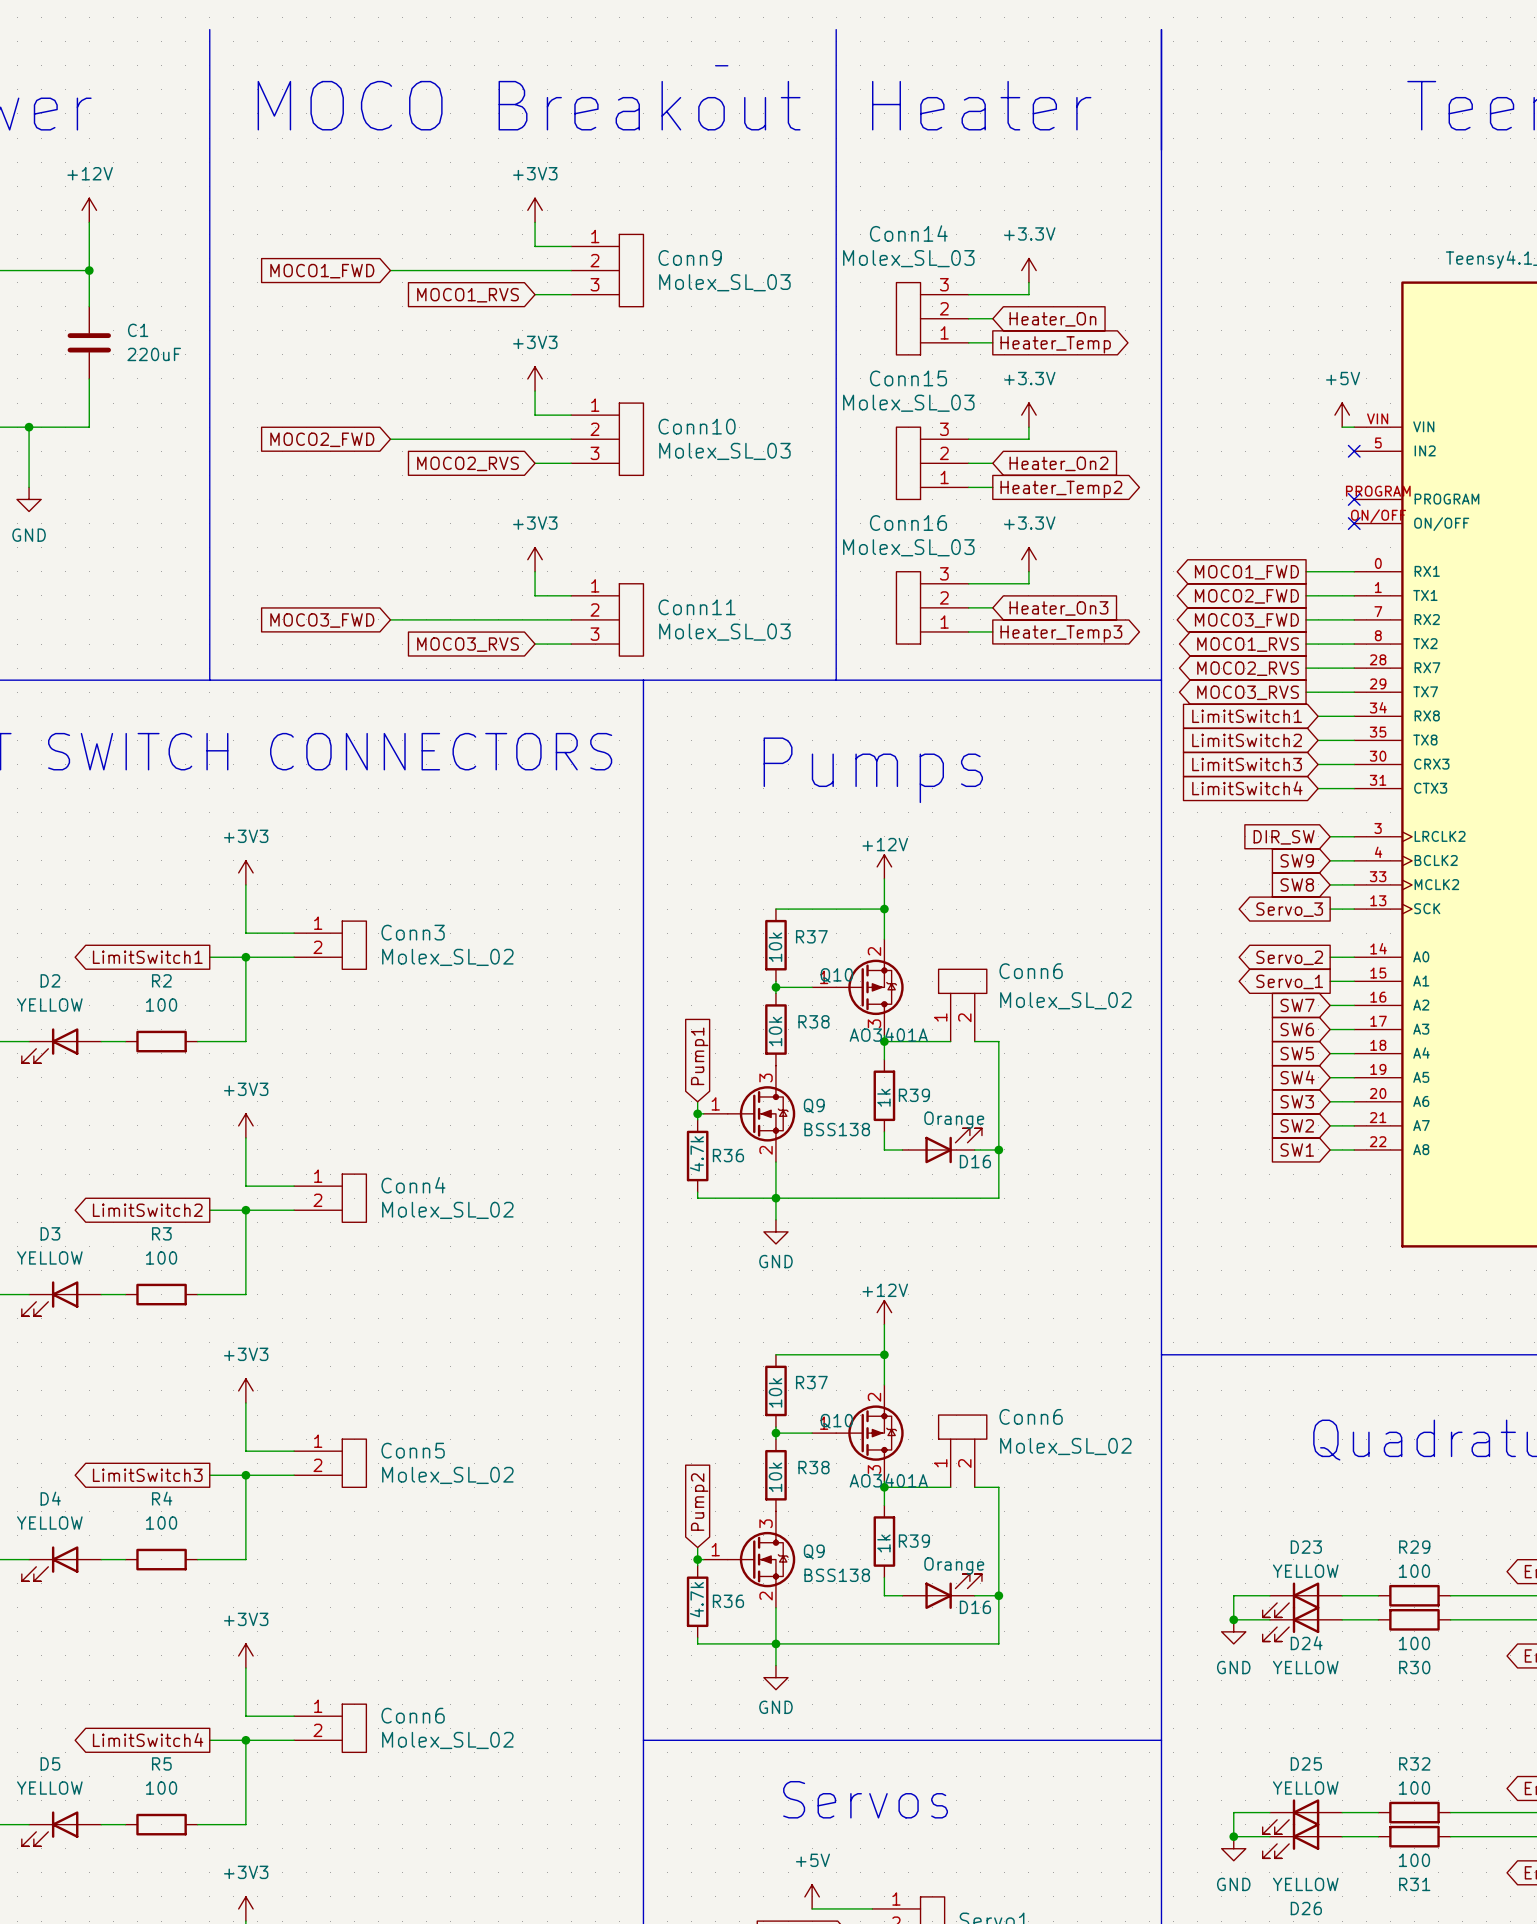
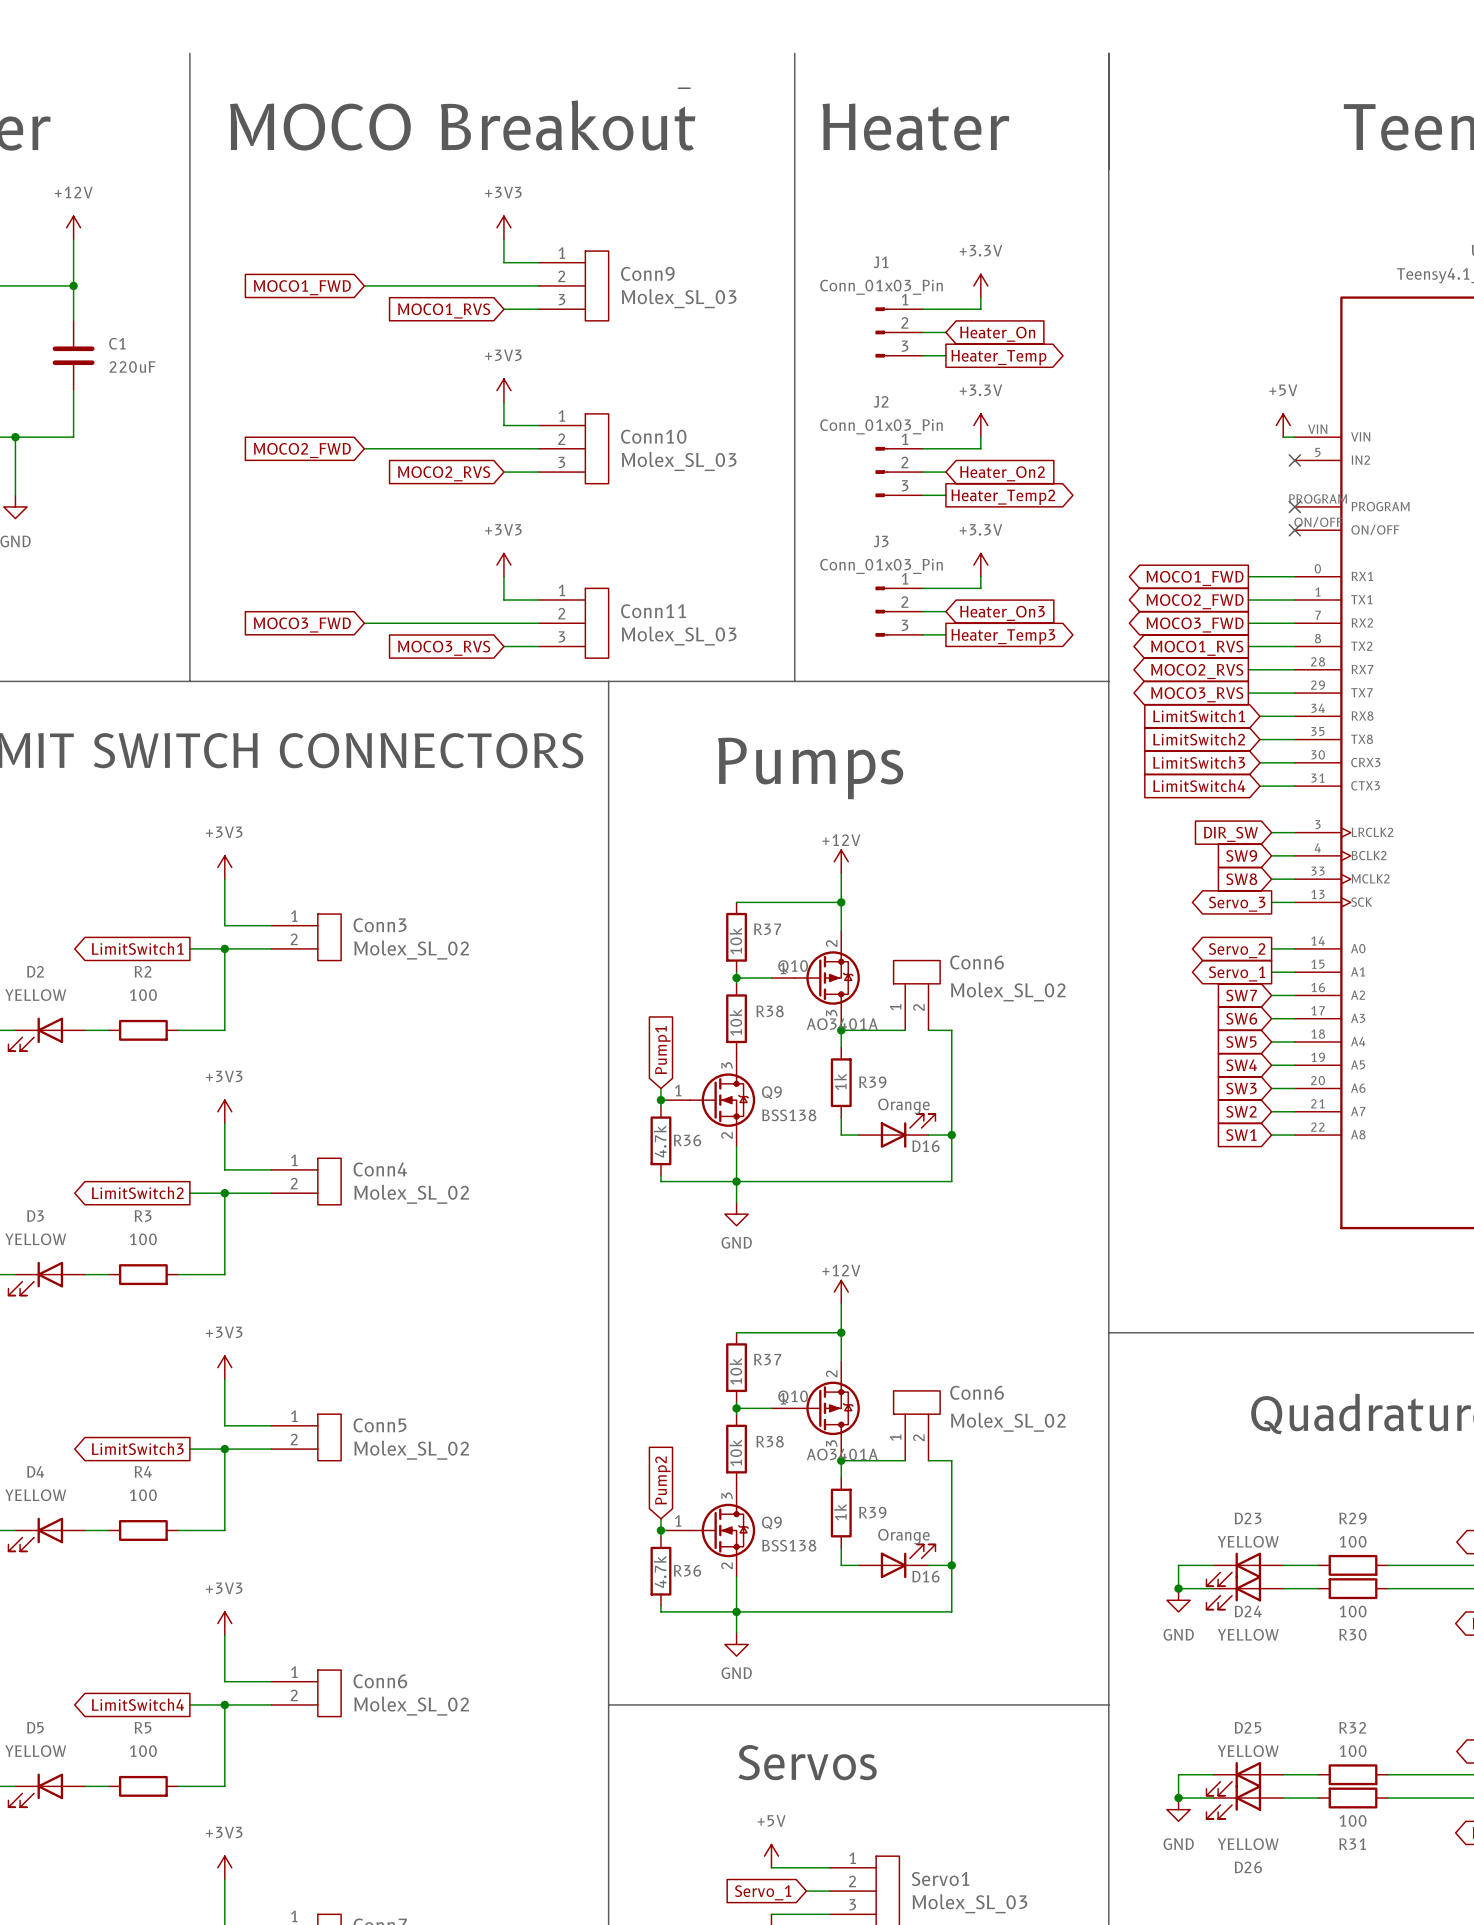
Conn14: Molex_SL_03 (932, 318) -> none
J1: none -> Conn_01x03_Pin (899, 332)
Conn15: Molex_SL_03 (932, 463) -> none
J2: none -> Conn_01x03_Pin (899, 472)
Conn16: Molex_SL_03 (932, 607) -> none
J3: none -> Conn_01x03_Pin (899, 611)

